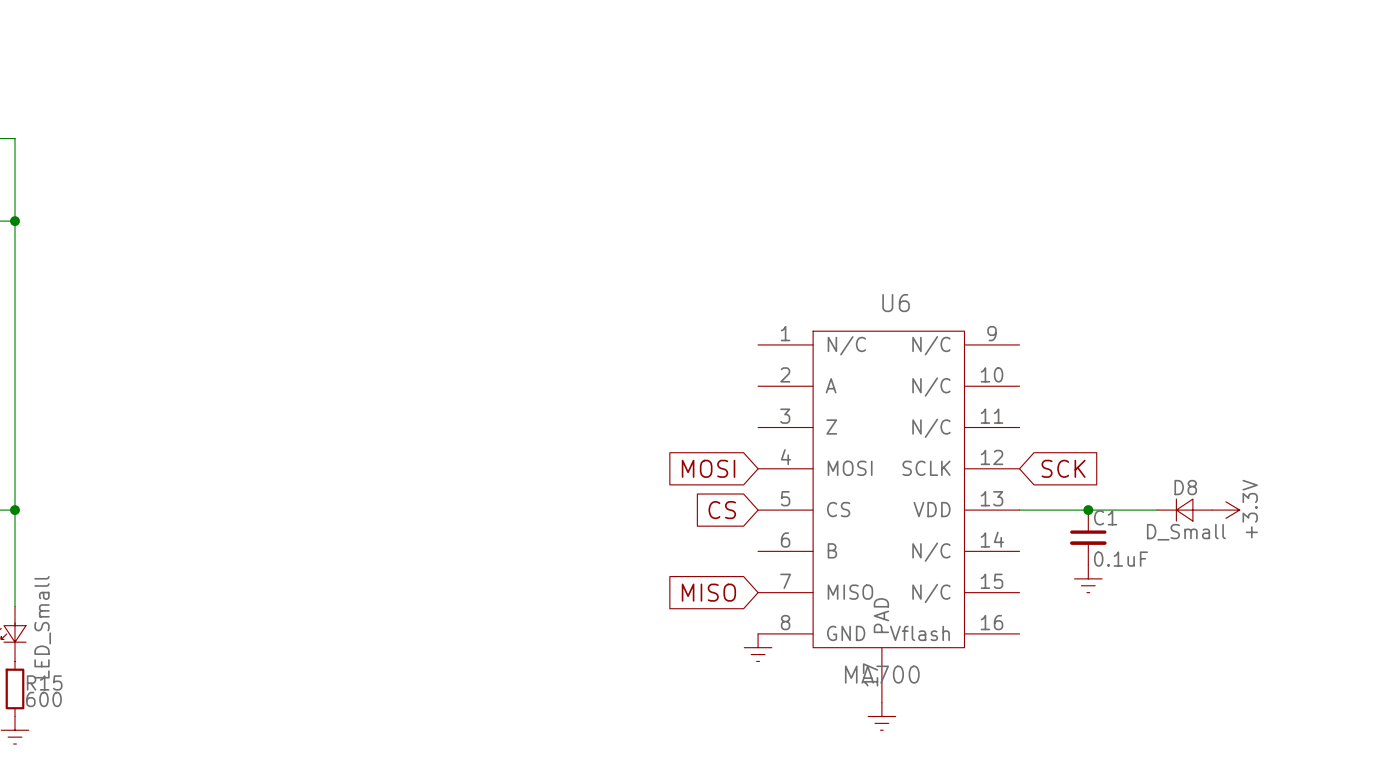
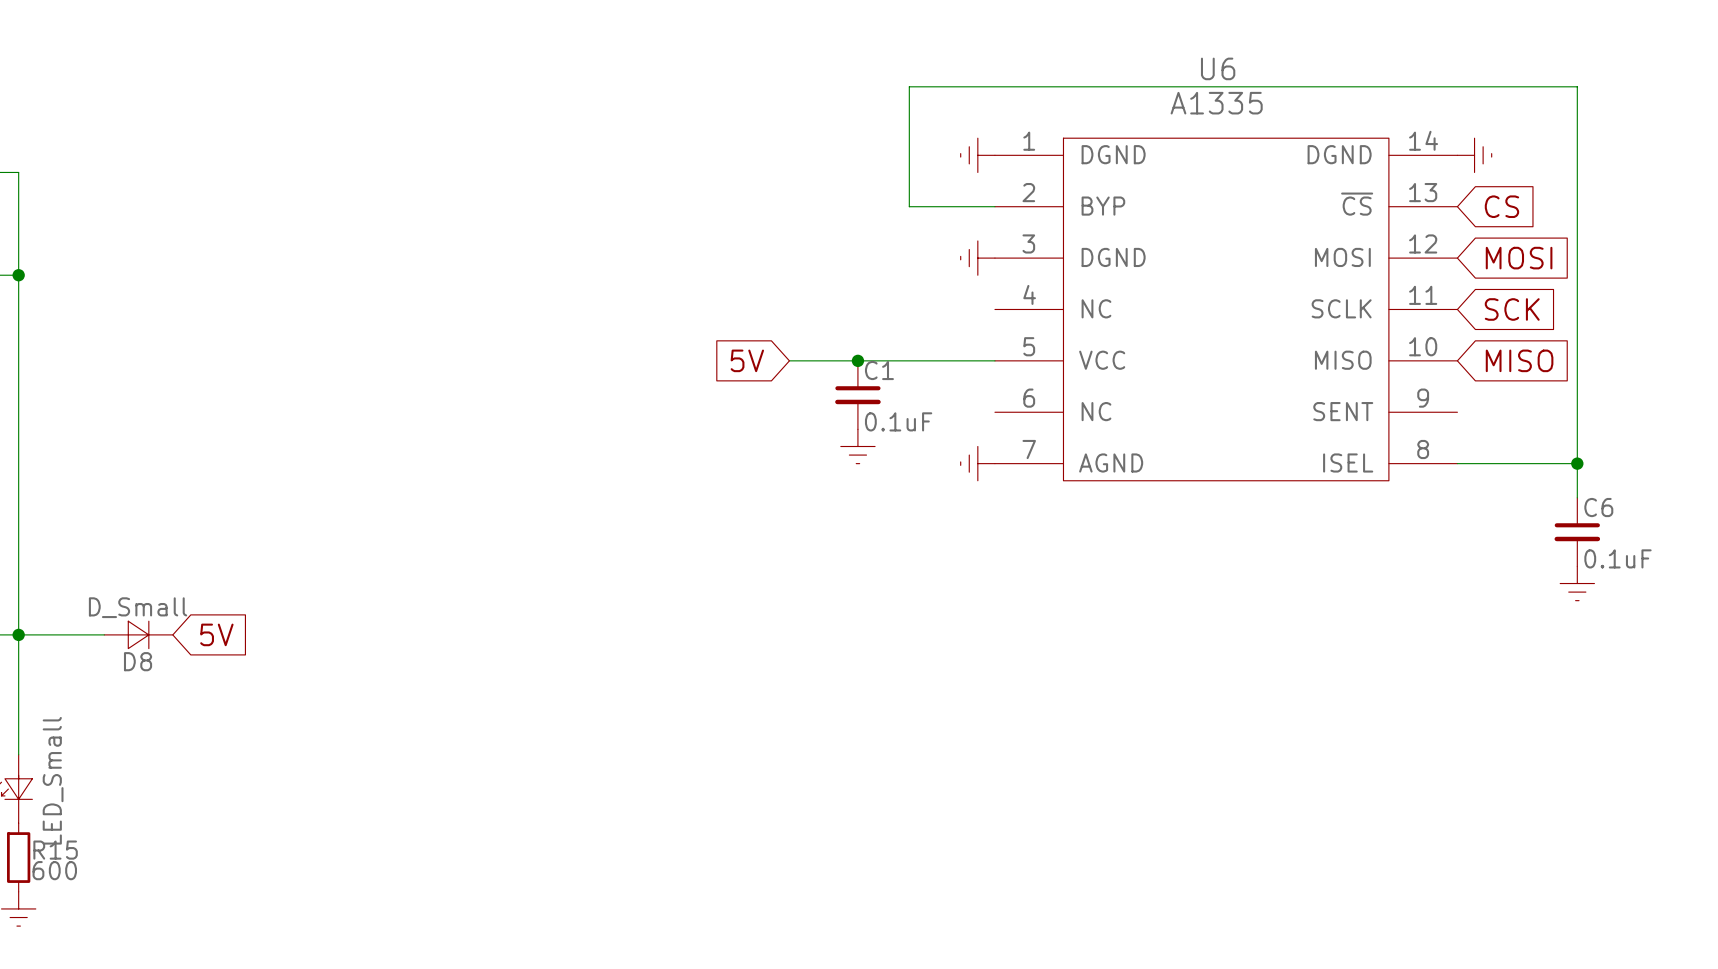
power symbol: none -> (977, 155)
power symbol: none -> (1474, 155)
wire: none -> (994, 206) (909, 206) (909, 86) (1577, 86) (1577, 497)
global label: none -> CS (1501, 206)
power symbol: none -> (977, 258)
global label: none -> MOSI (1519, 258)
global label: none -> 5V (747, 360)
wire: none -> (789, 360) (994, 360)
junction: none -> (857, 360)
global label: none -> MISO (1519, 360)
U6 name position: U6 (896, 303) -> U6 (1218, 68)
U6 symbol: [758, 331, 1020, 703] -> [994, 138, 1458, 481]
power symbol: none -> (857, 446)
power symbol: none -> (977, 463)
wire: none -> (1457, 463) (1577, 463)
junction: none -> (1577, 463)
C6: none -> 0.1uF (1577, 532)
global label: MOSI (708, 468) -> none
global label position: SCK (1063, 468) -> SCK (1512, 309)
power symbol: none -> (1577, 583)
D8 name position: D8 (1185, 487) -> D8 (138, 661)
wire: none -> (18, 634) (104, 634)
global label: none -> 5V (216, 634)
global label: CS (722, 510) -> none
wire: (1019, 510) (1157, 510) -> none
junction: (1088, 510) -> none
D8 position: (1184, 510) -> (138, 634)
power symbol: +3.3V (1225, 510) -> none
D8 value position: D_Small (1186, 532) -> D_Small (138, 607)
C1 position: (1088, 537) -> (857, 395)
power symbol: (1088, 578) -> none
global label: MISO (708, 592) -> none
power symbol: (758, 647) -> none
U6 value: MA700 (882, 674) -> A1335 (1216, 103)
power symbol: (881, 716) -> none

